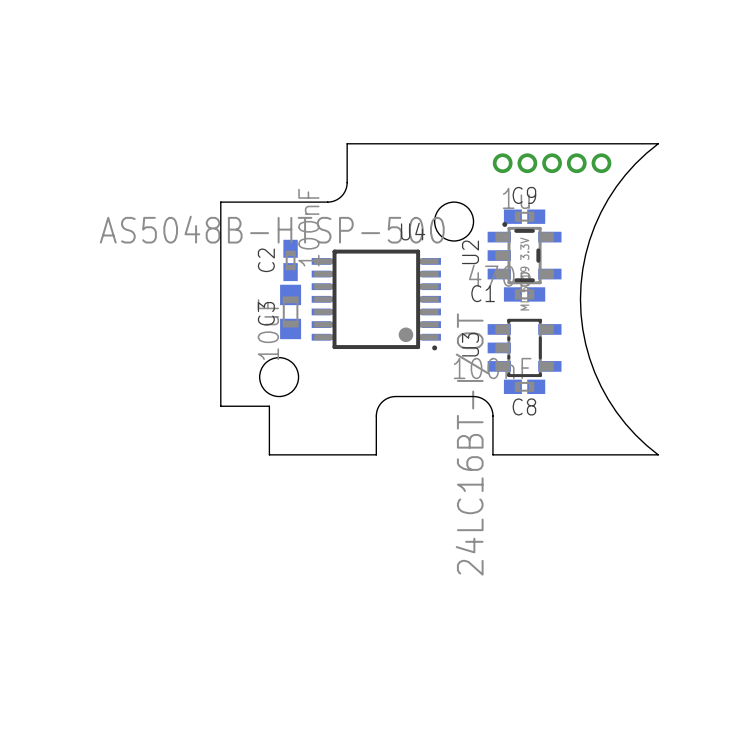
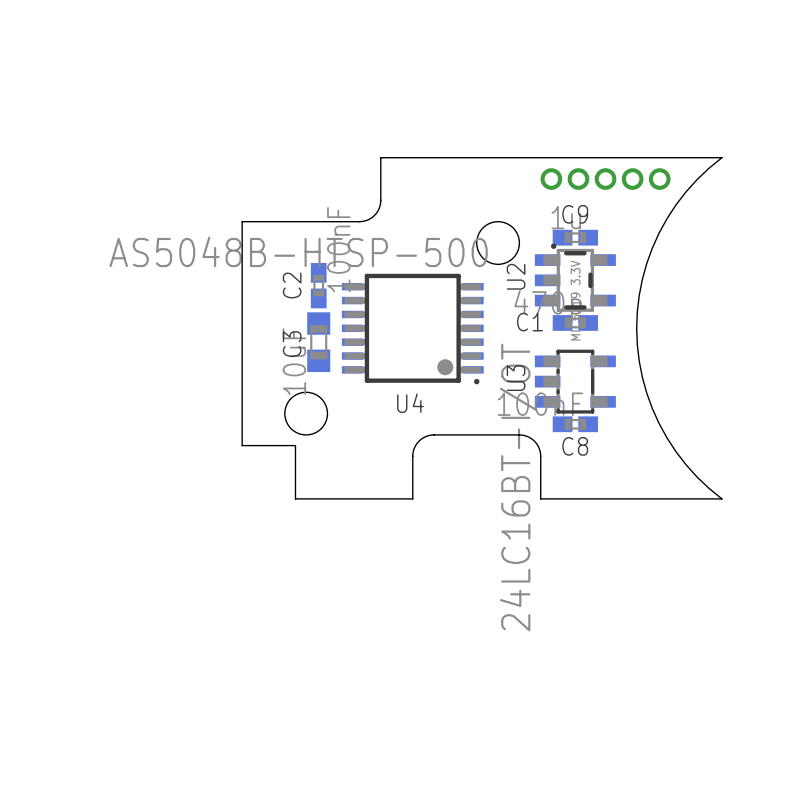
U4 name position: U4 (413, 231) -> U4 (410, 403)

